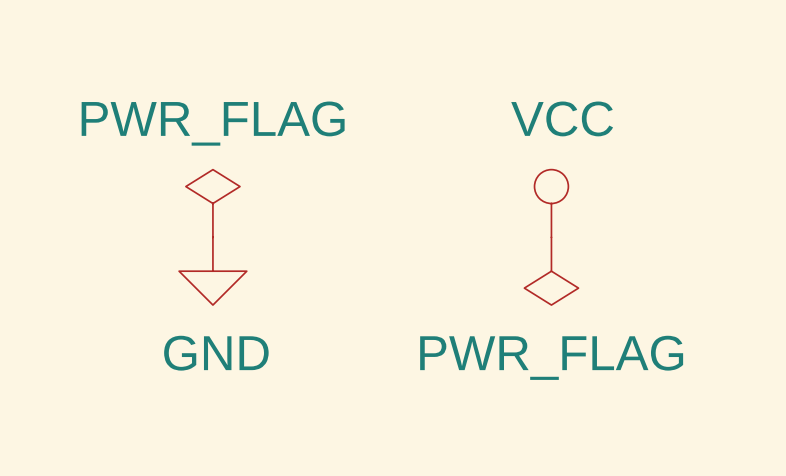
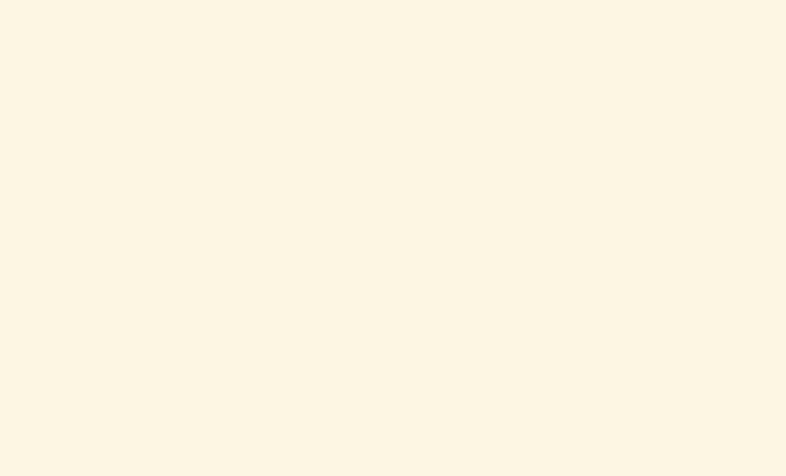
power symbol: PWR_FLAG (212, 203) -> none
power symbol: VCC (551, 203) -> none
power symbol: GND (212, 271) -> none
power symbol: PWR_FLAG (551, 271) -> none

